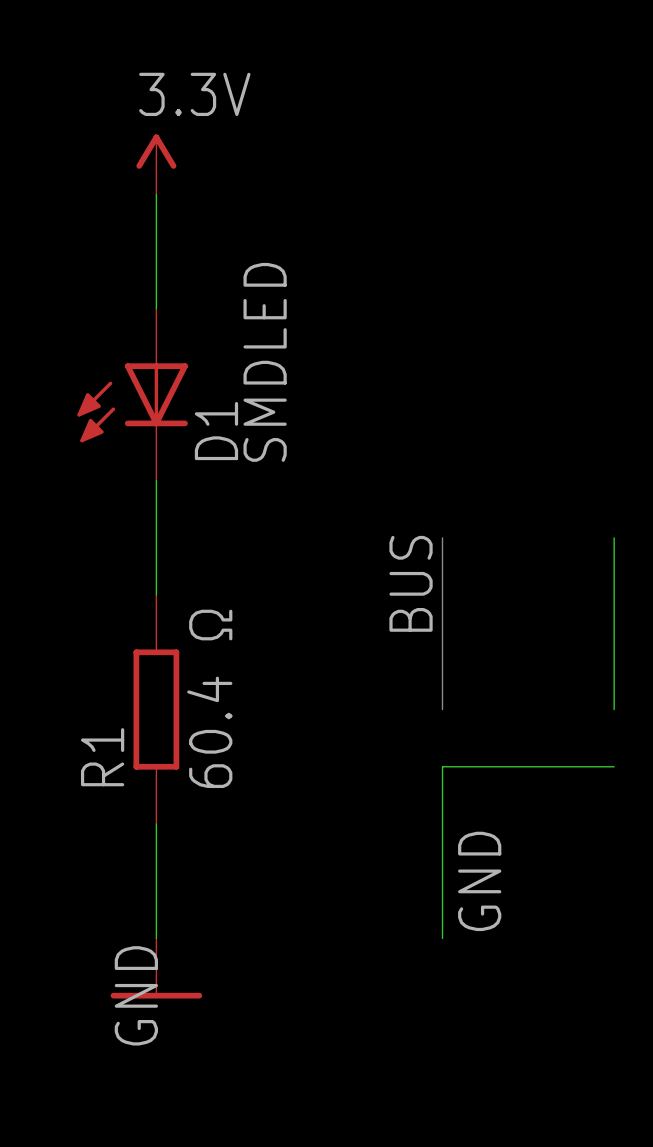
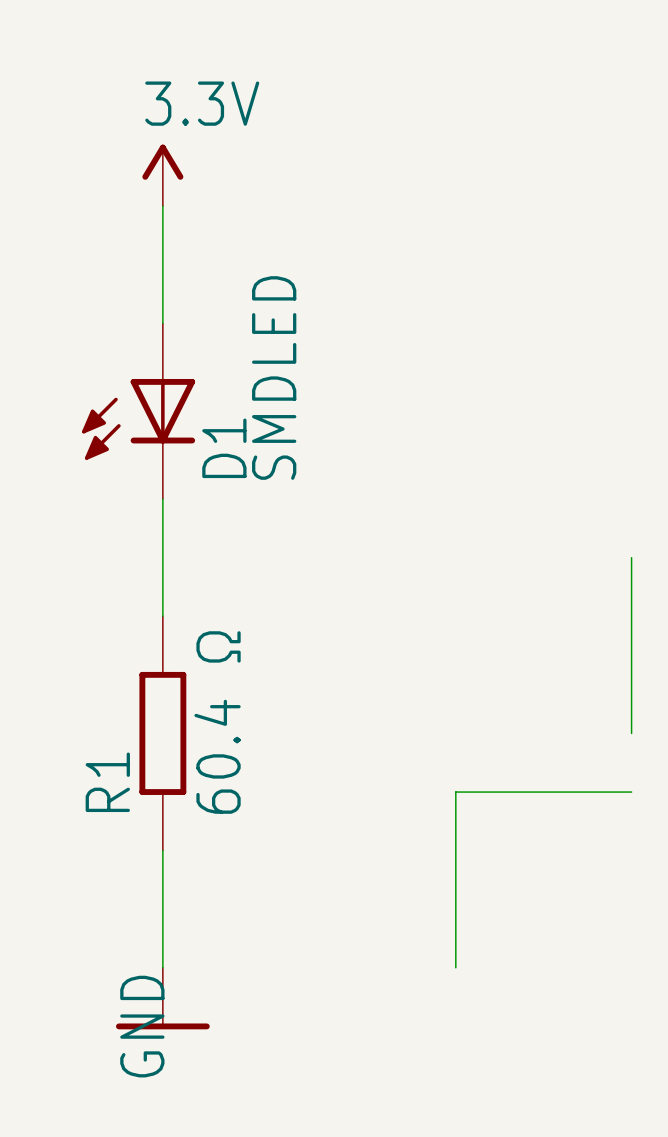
bus: (442, 537) (442, 709) -> none
label: BUS (411, 583) -> none
label: GND (479, 881) -> none

